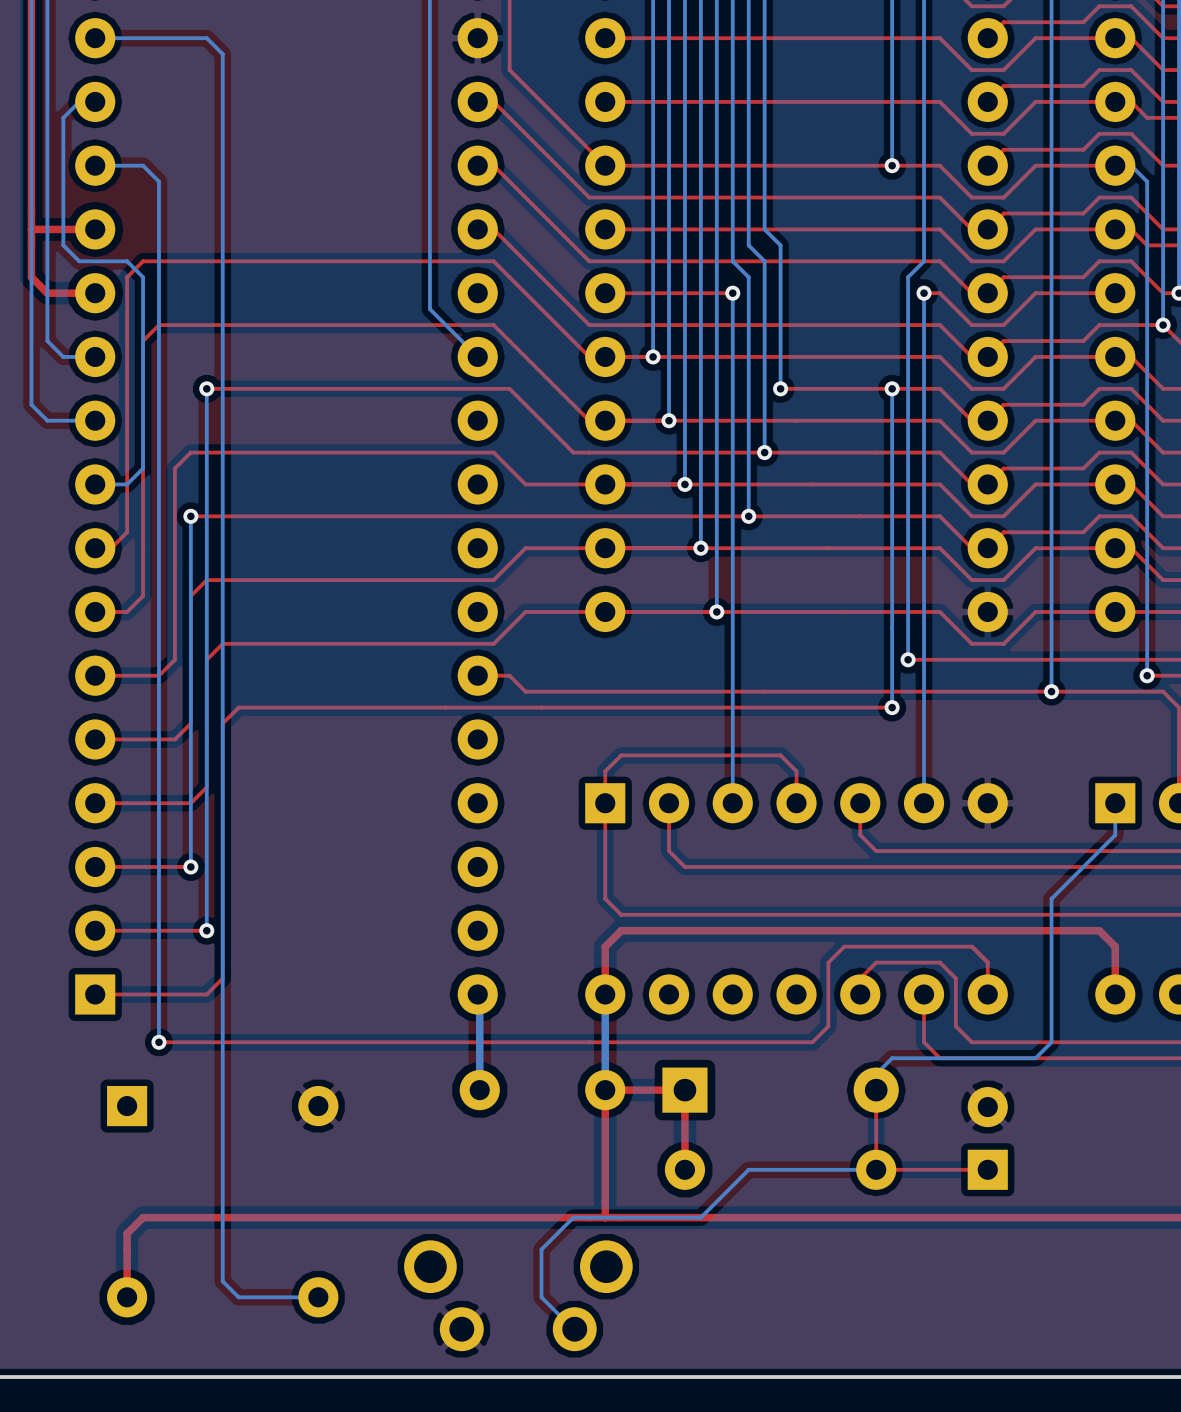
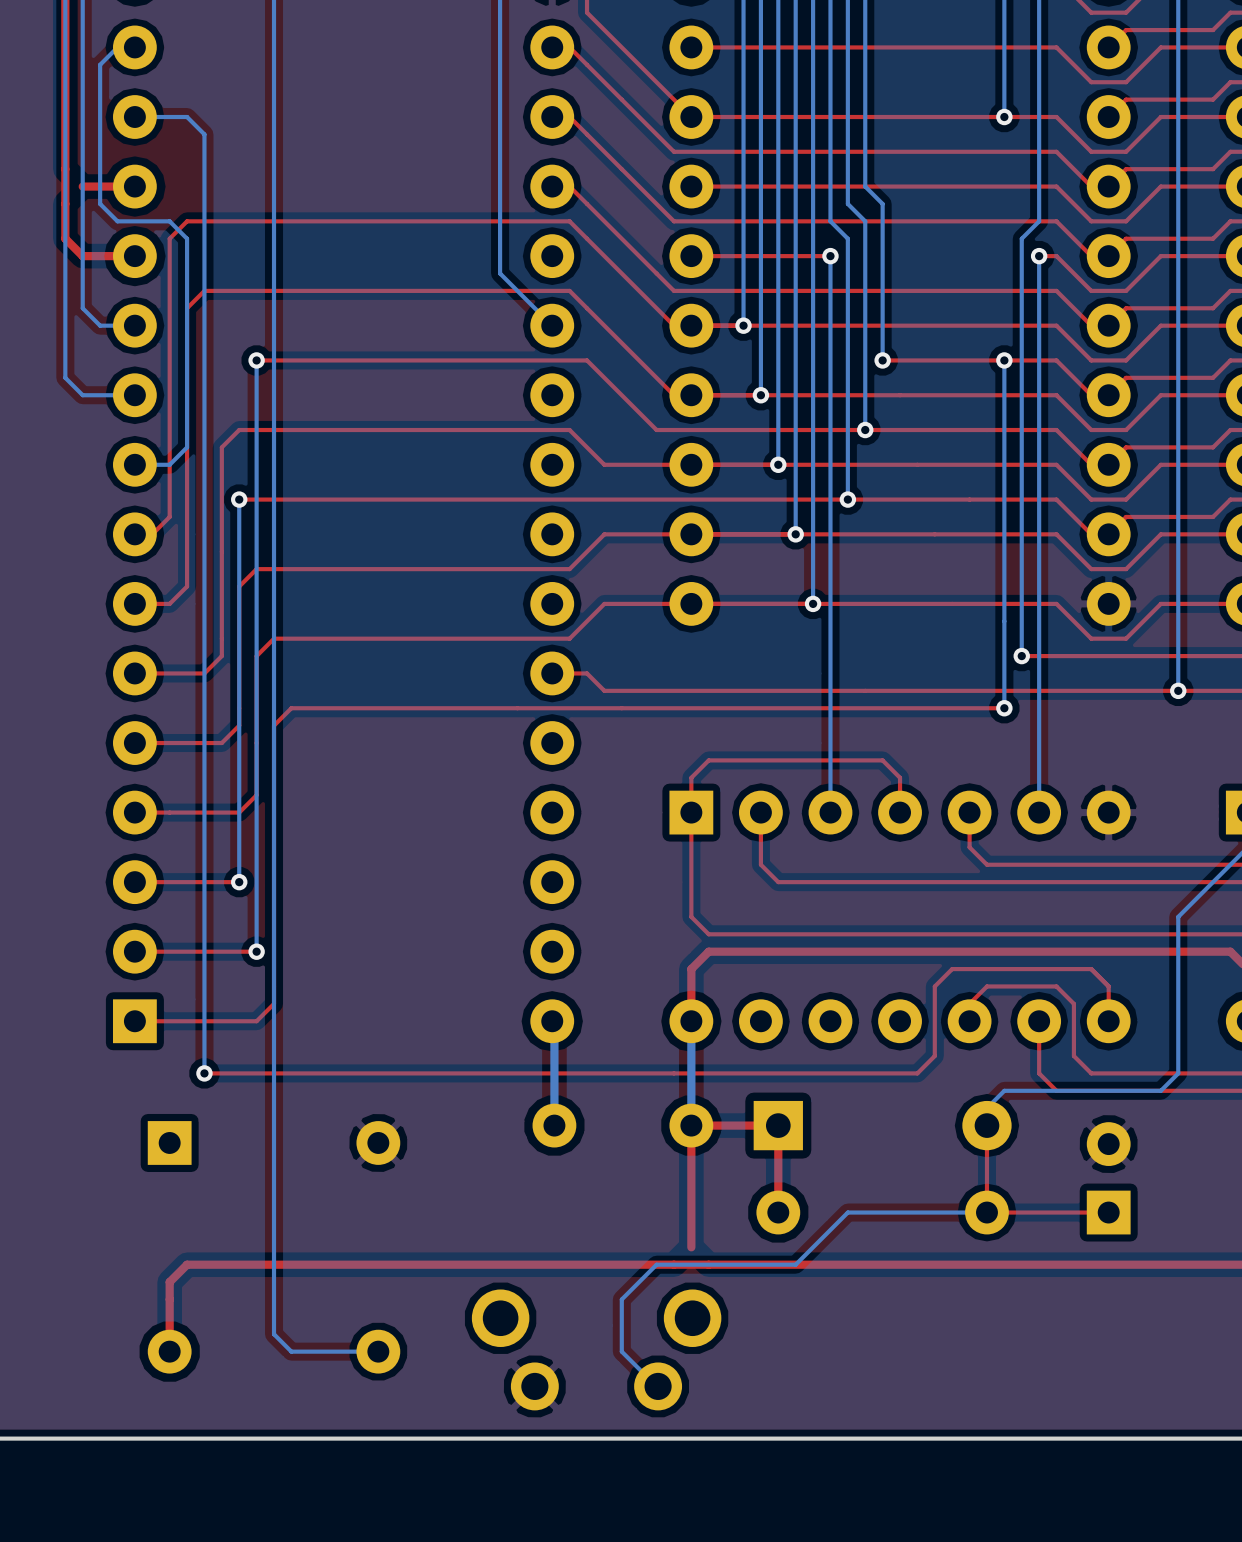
top track: (47, 229) (31, 229) -> none
top track: (605, 1201) (605, 1217) -> none

